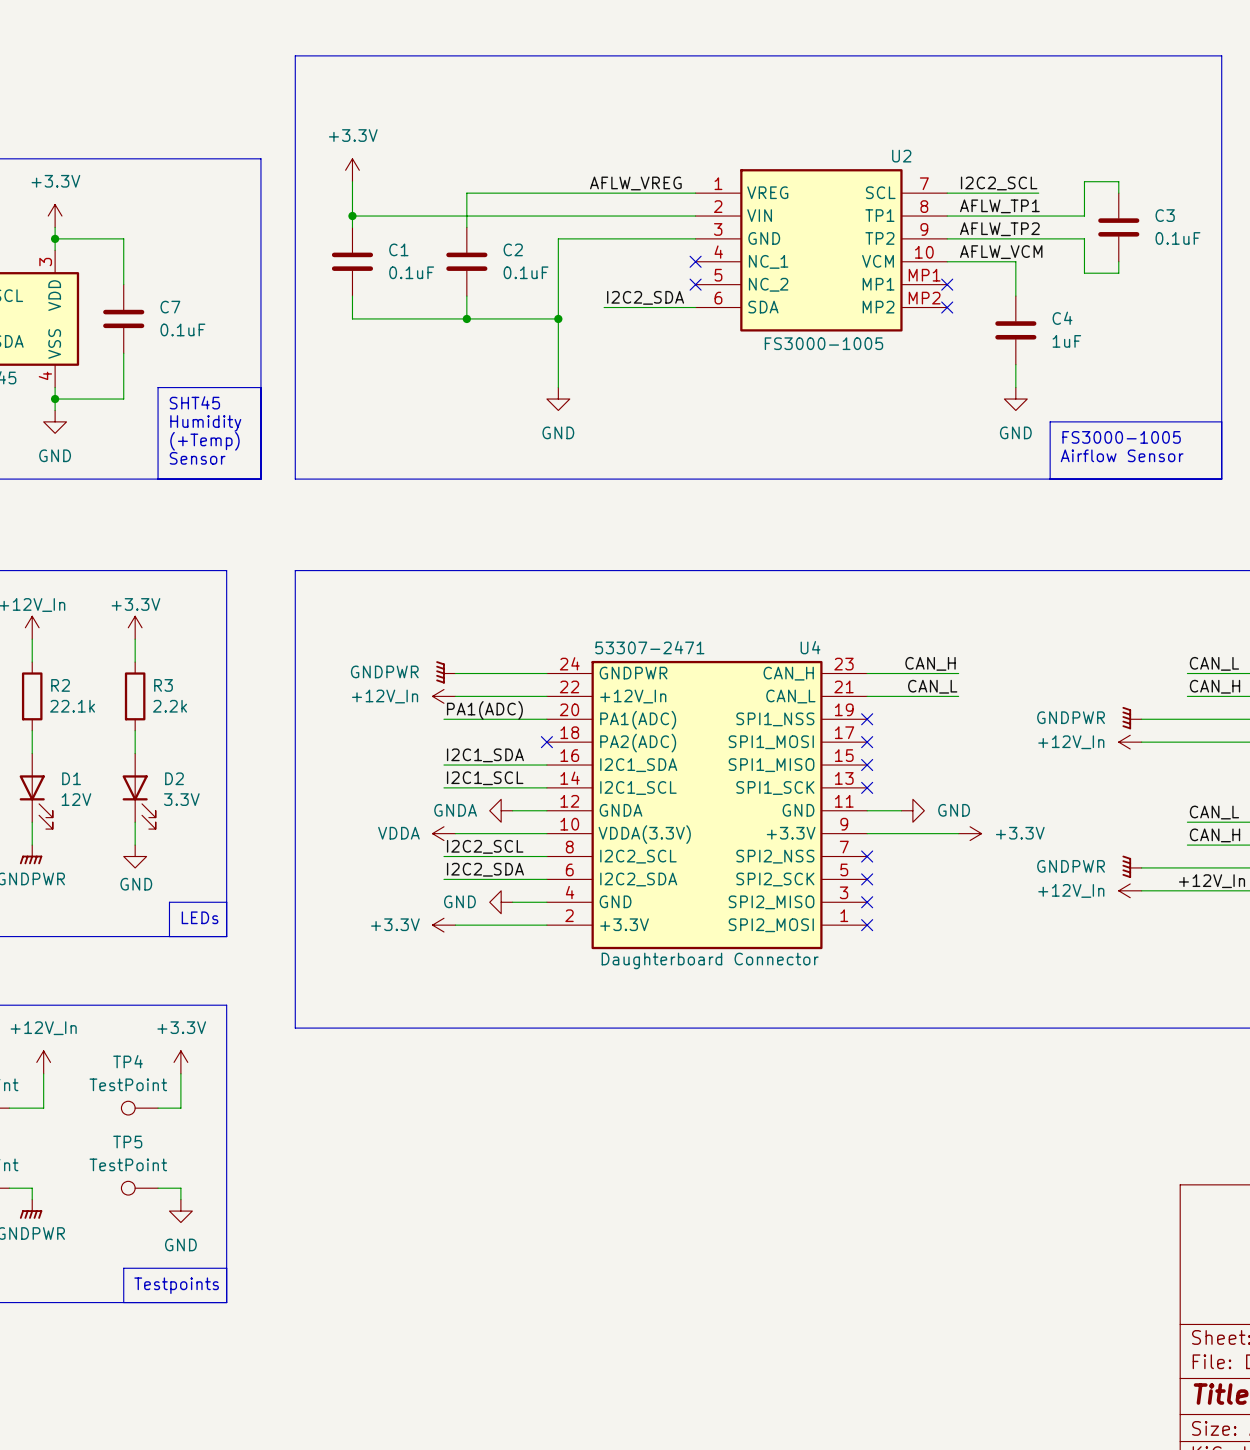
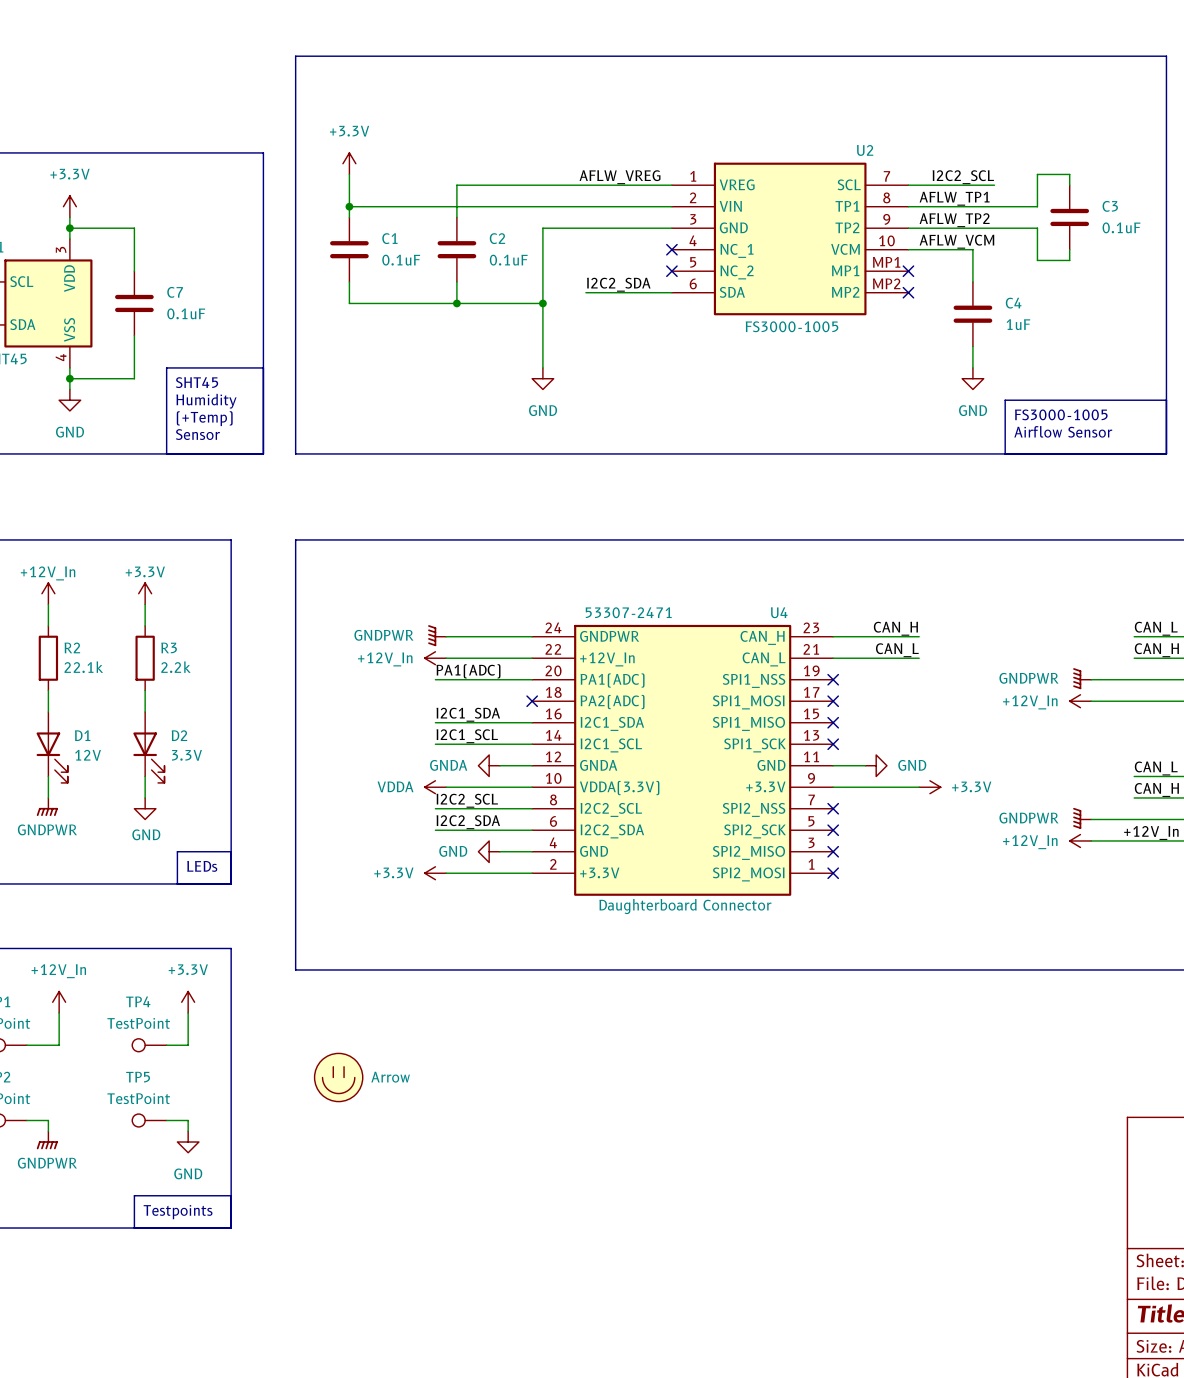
part: none -> Arrow (338, 1077)

